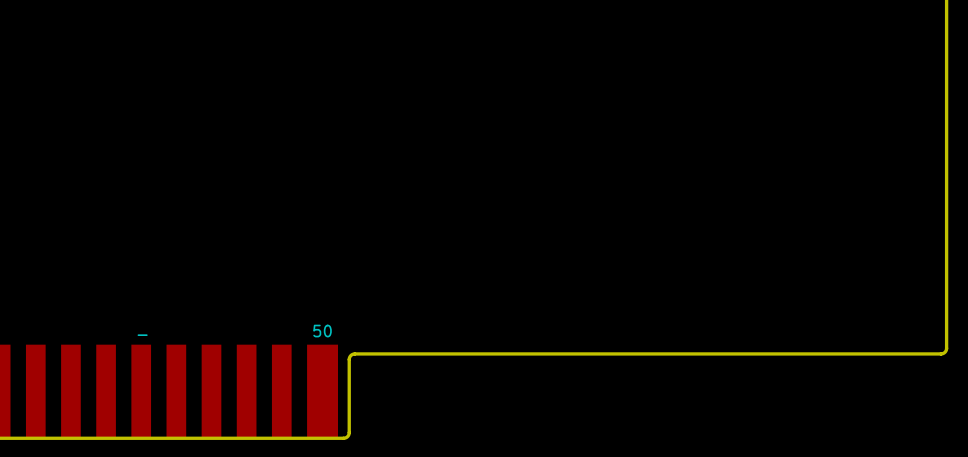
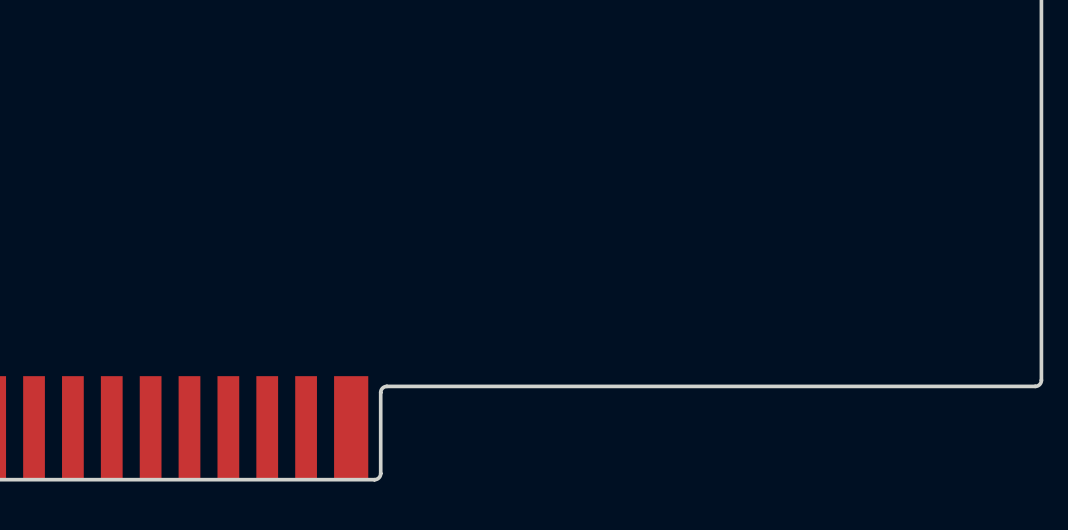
text: 50 (322, 331) -> none
text: - (142, 335) -> none

